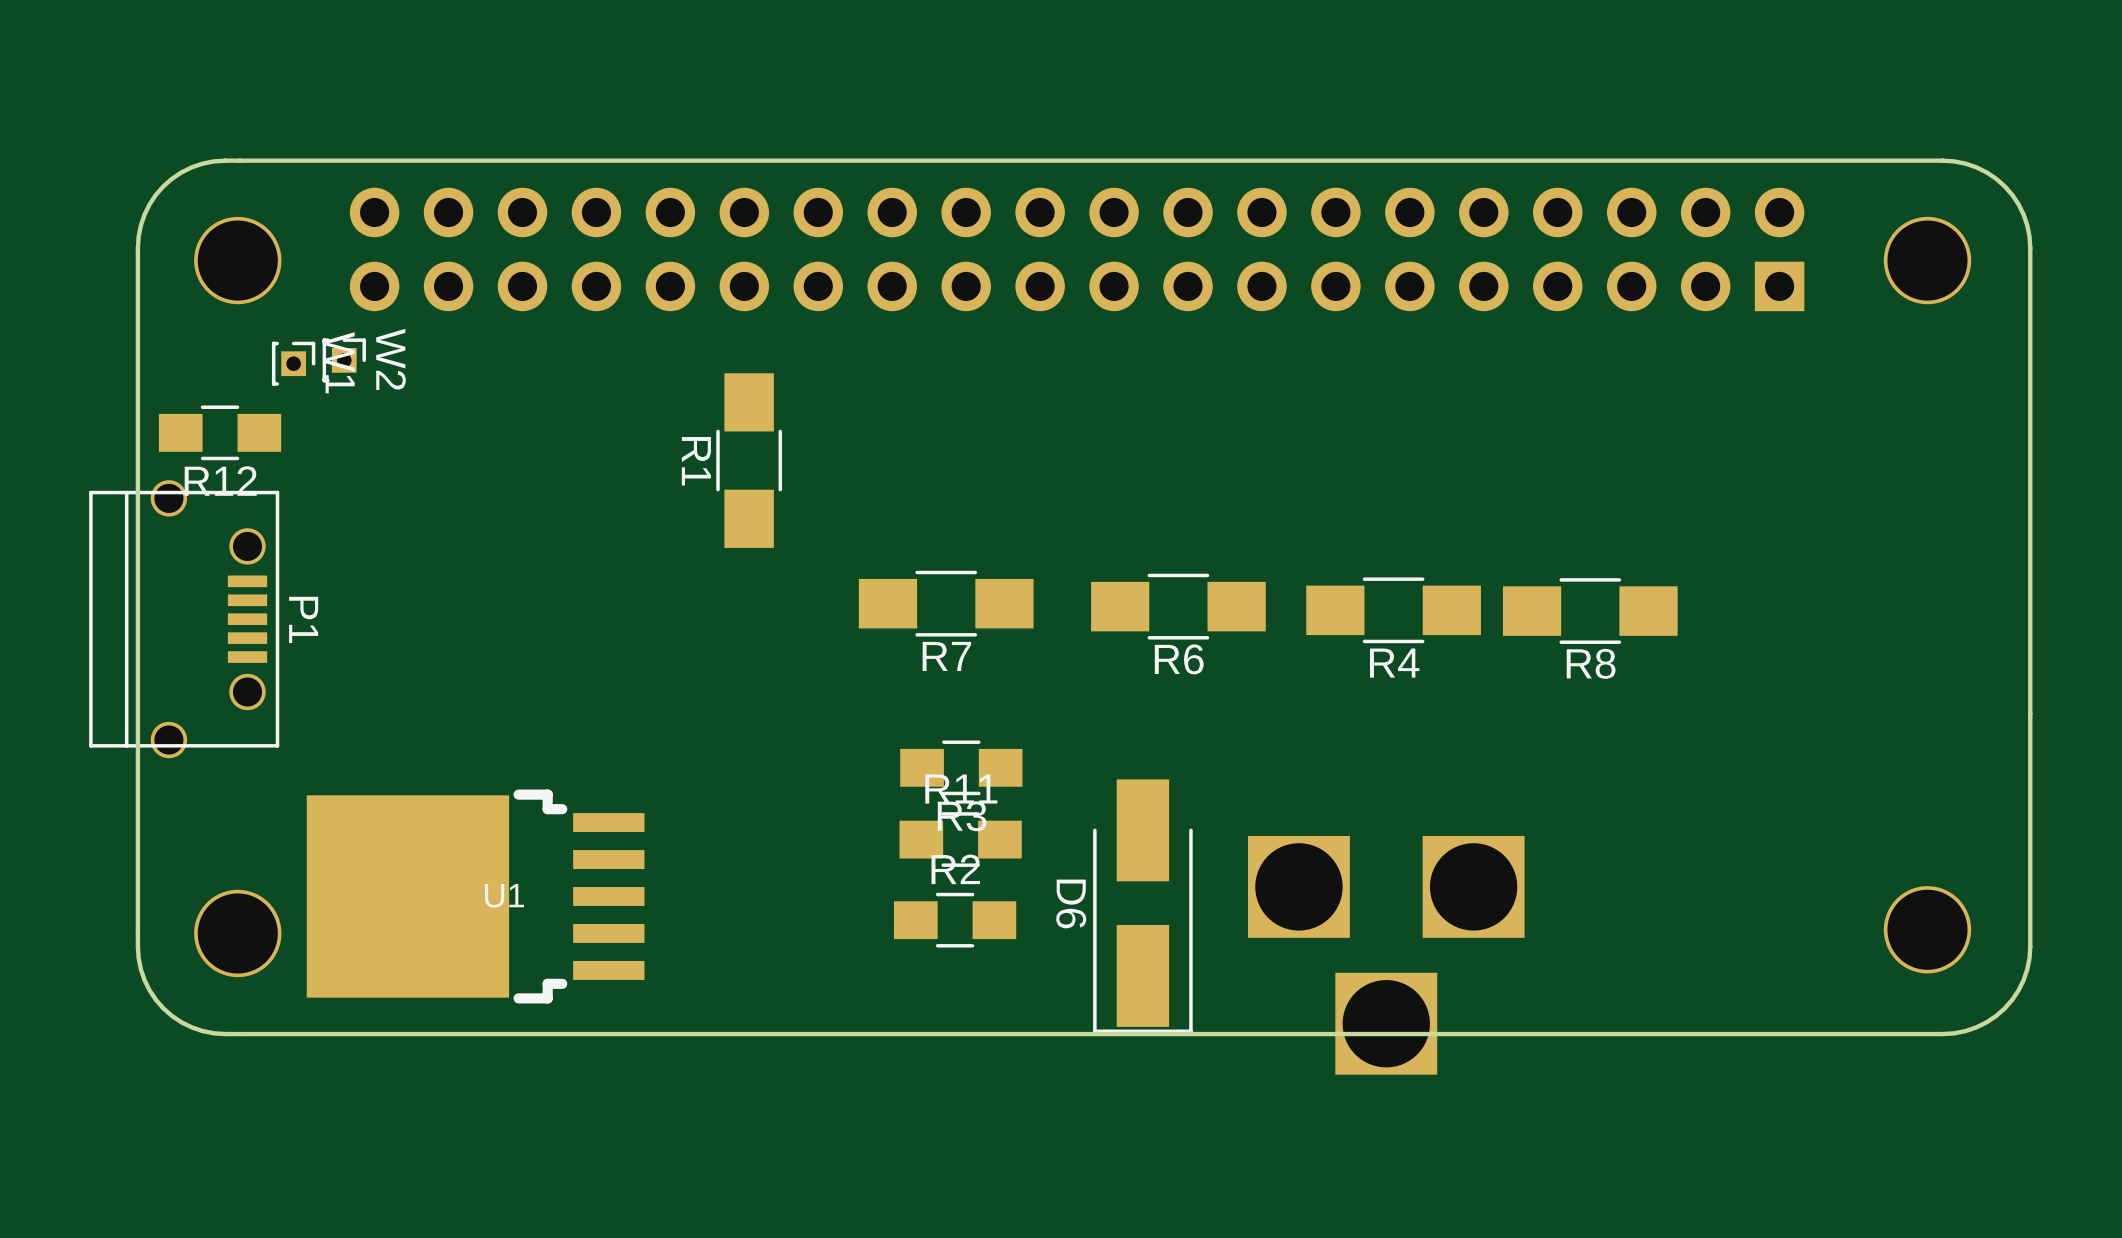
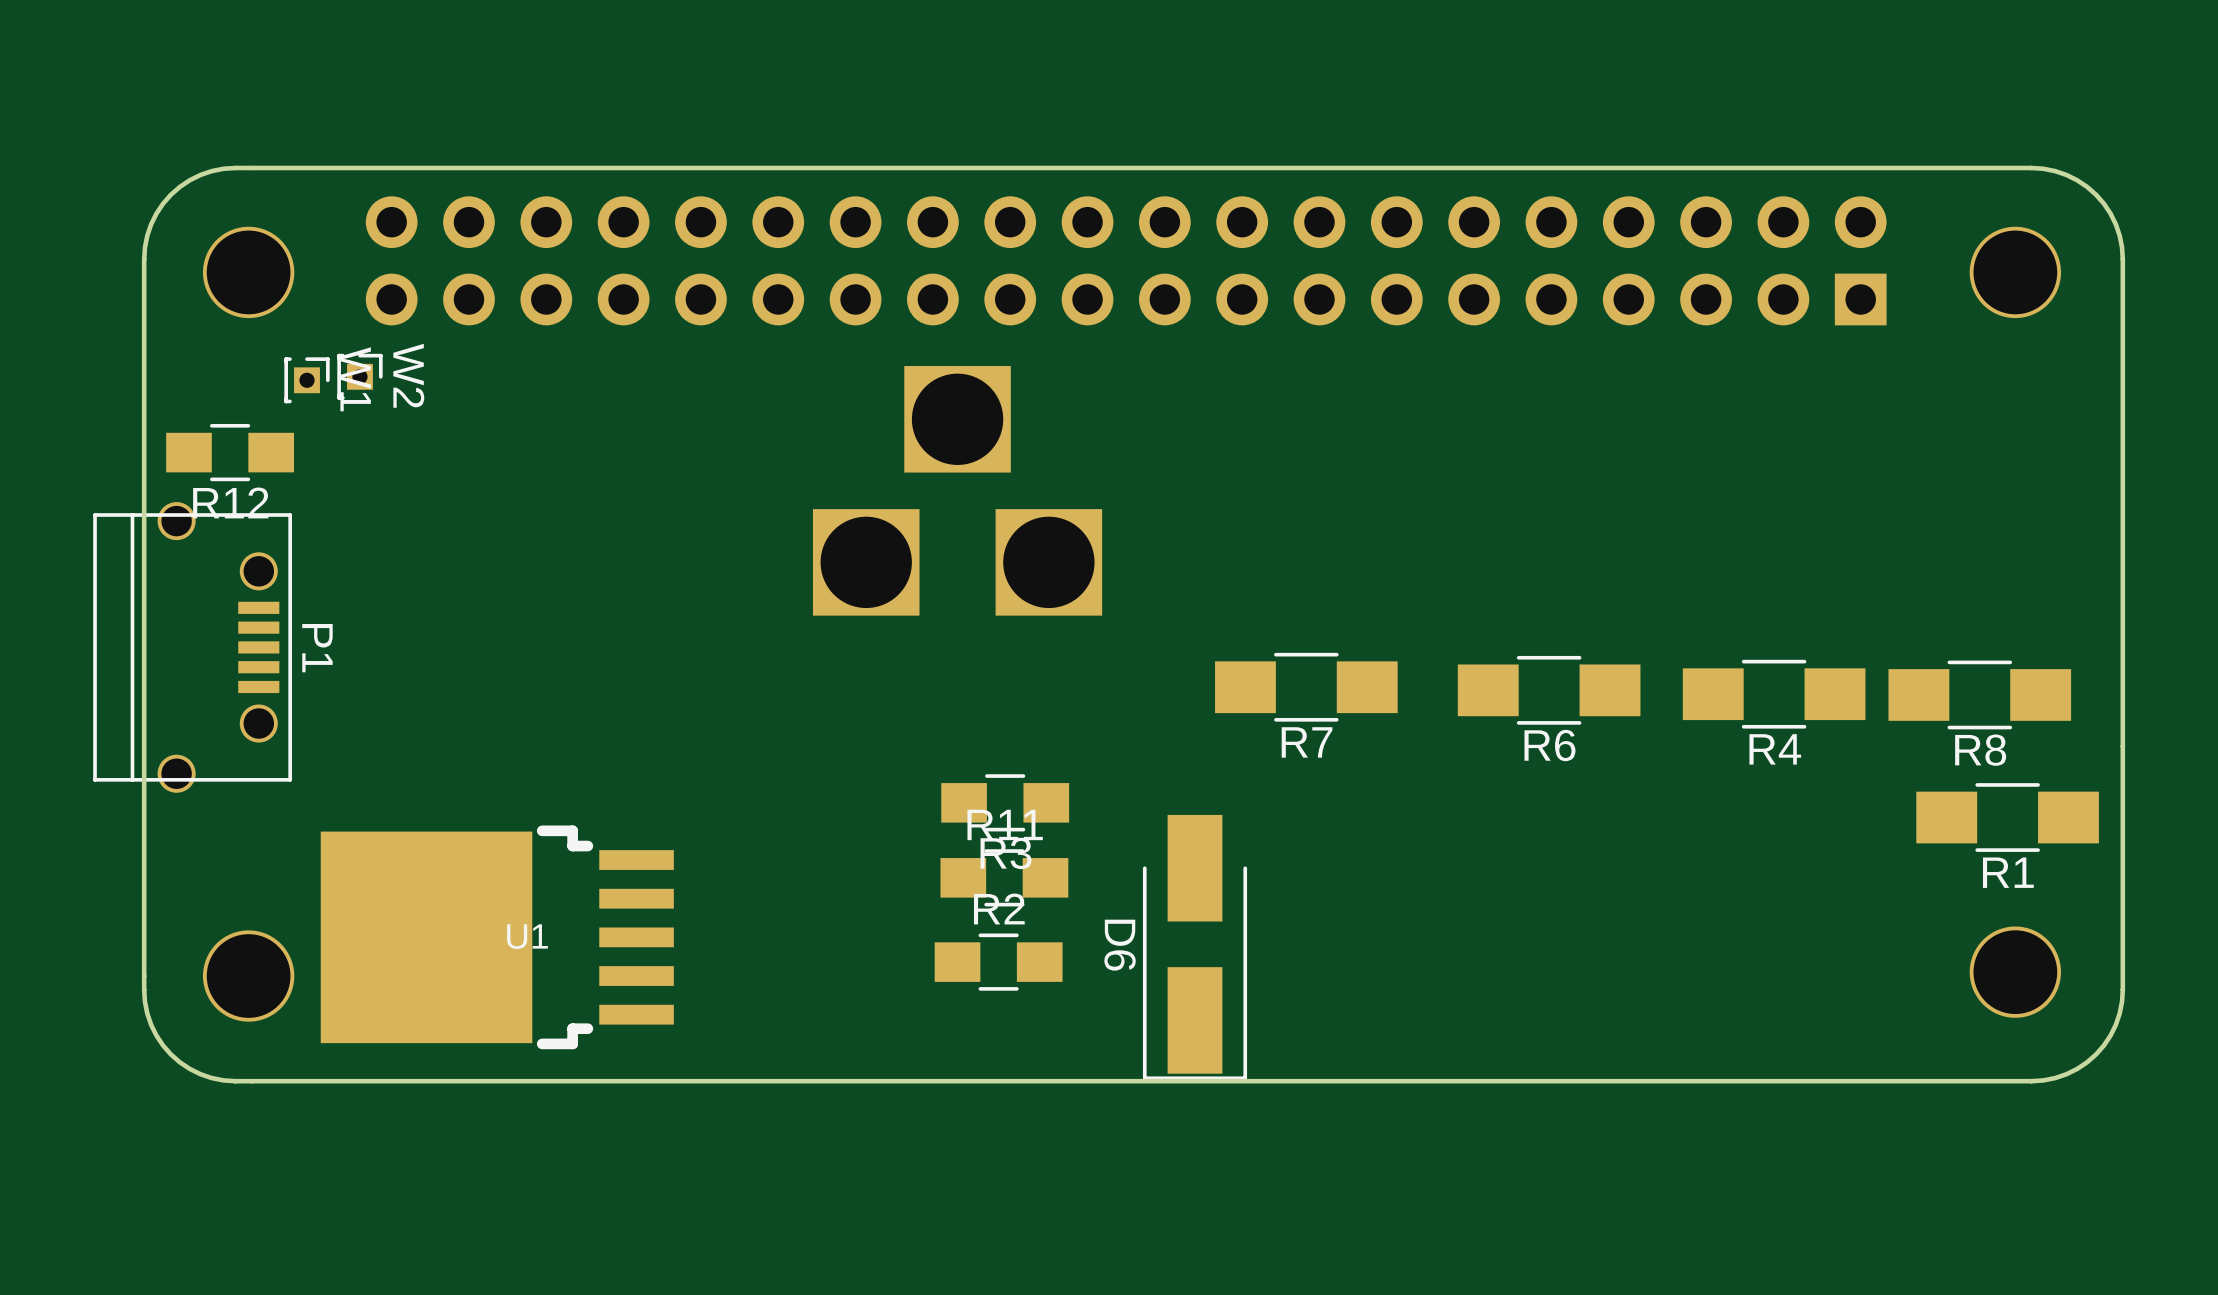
R1 rotation: 0° (749, 460) -> 90° clockwise (2007, 817)
R1 position: (749, 460) -> (2007, 817)
R1 name position: R1 (696, 461) -> R1 (2008, 872)
R7 position: (946, 603) -> (1306, 687)
R6 position: (1178, 606) -> (1549, 690)
R4 position: (1393, 610) -> (1774, 694)
R8 position: (1590, 611) -> (1979, 694)
part rotation: 0° (1386, 955) -> 180° (957, 490)
part position: (1386, 955) -> (957, 490)

